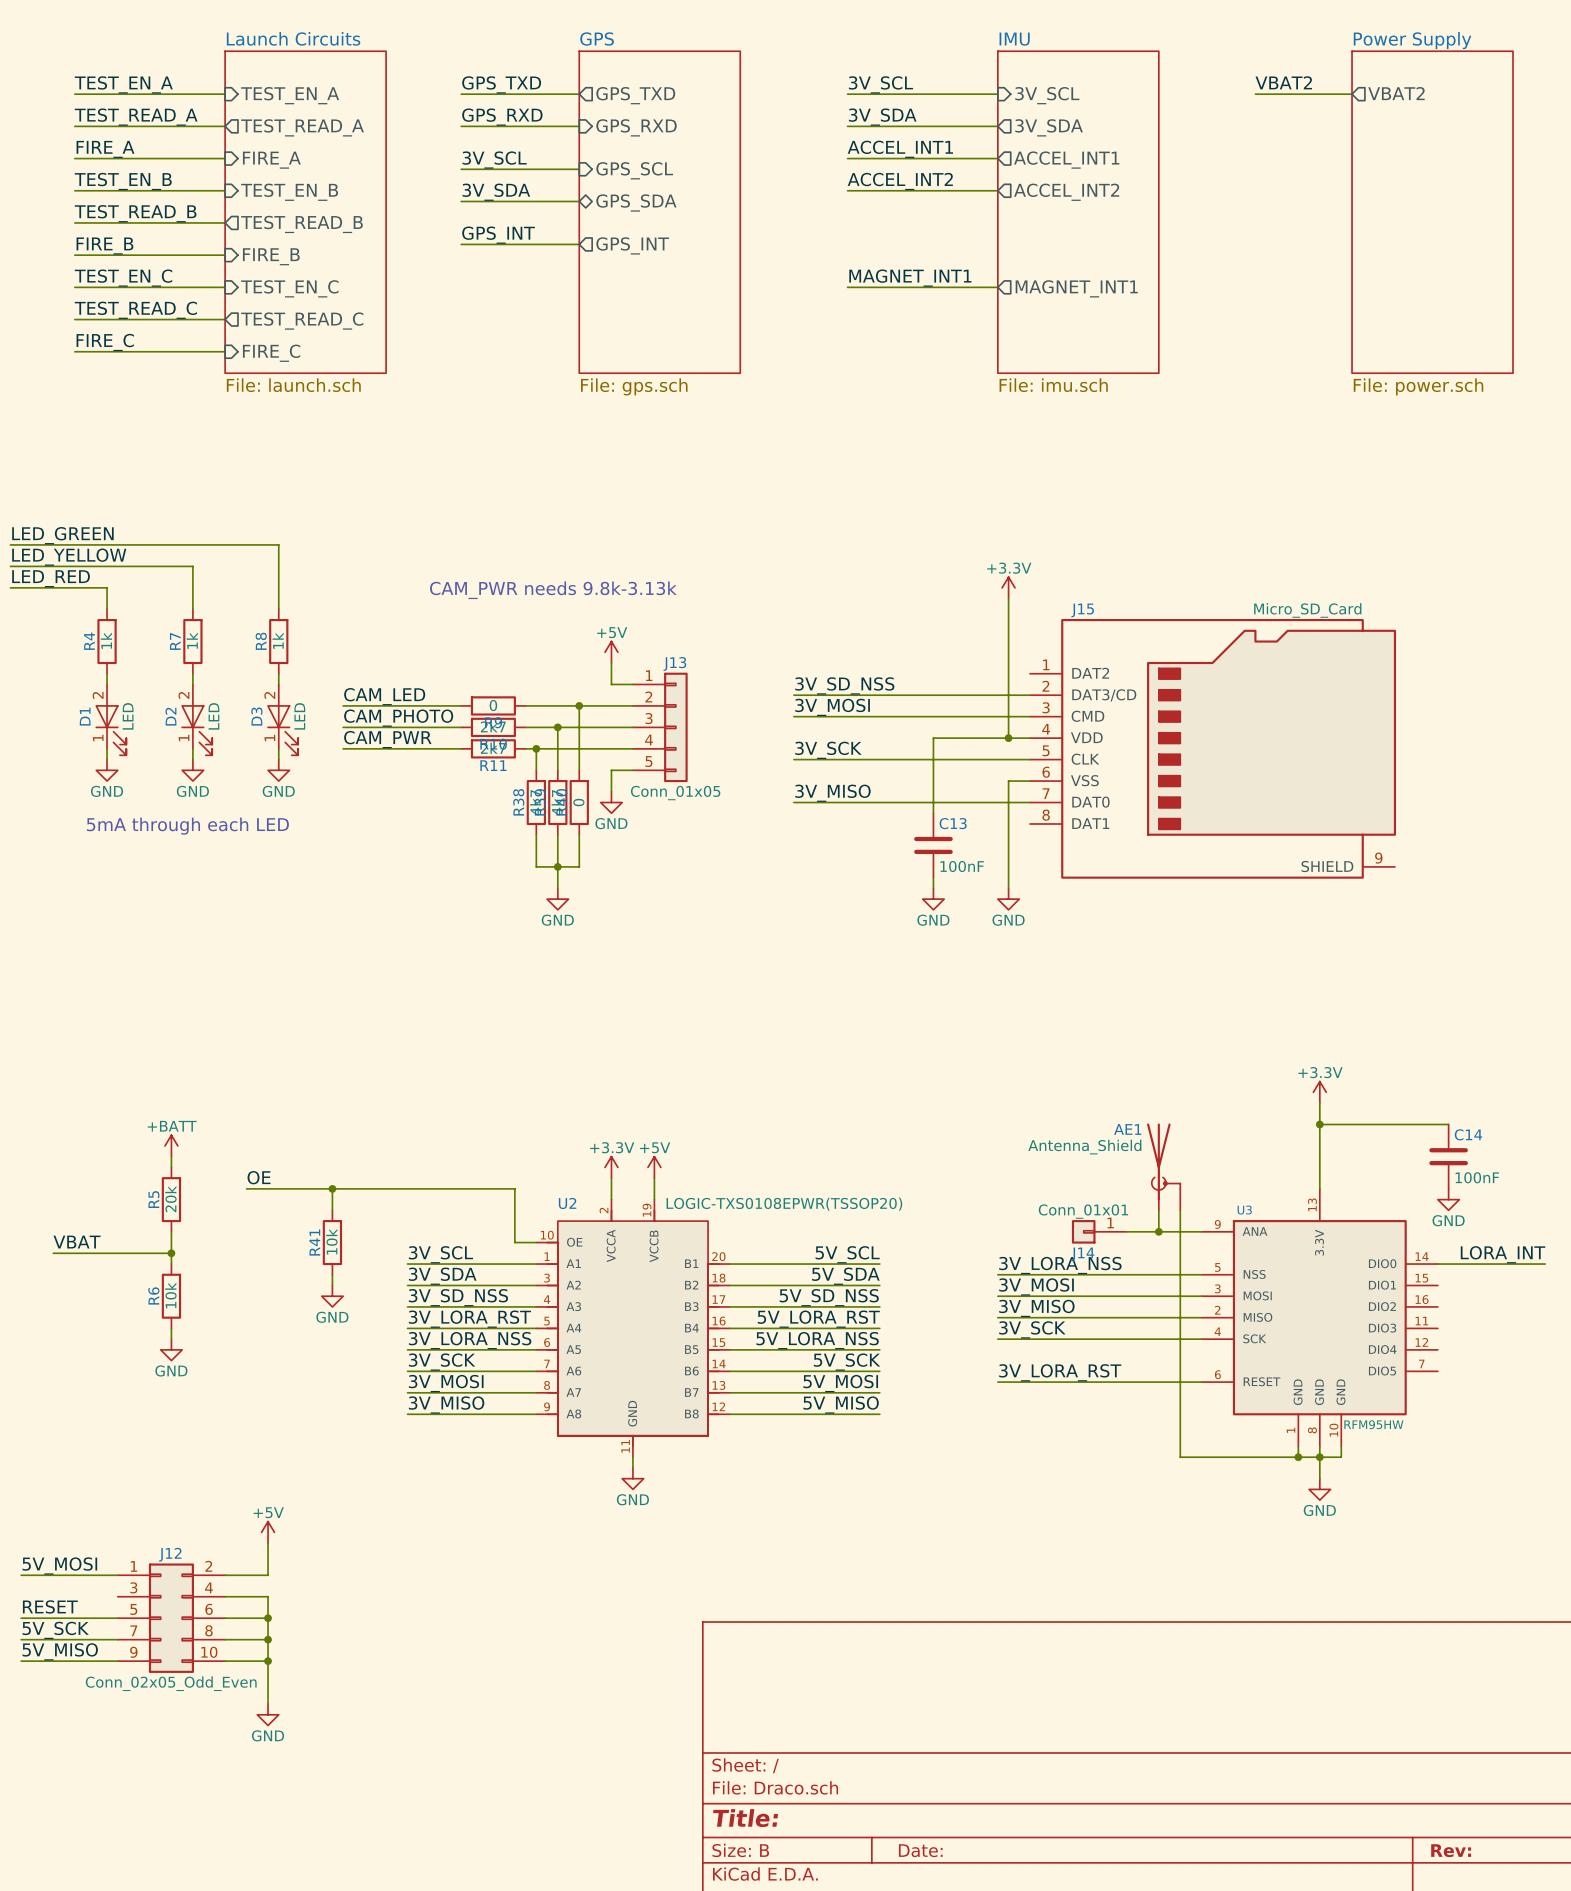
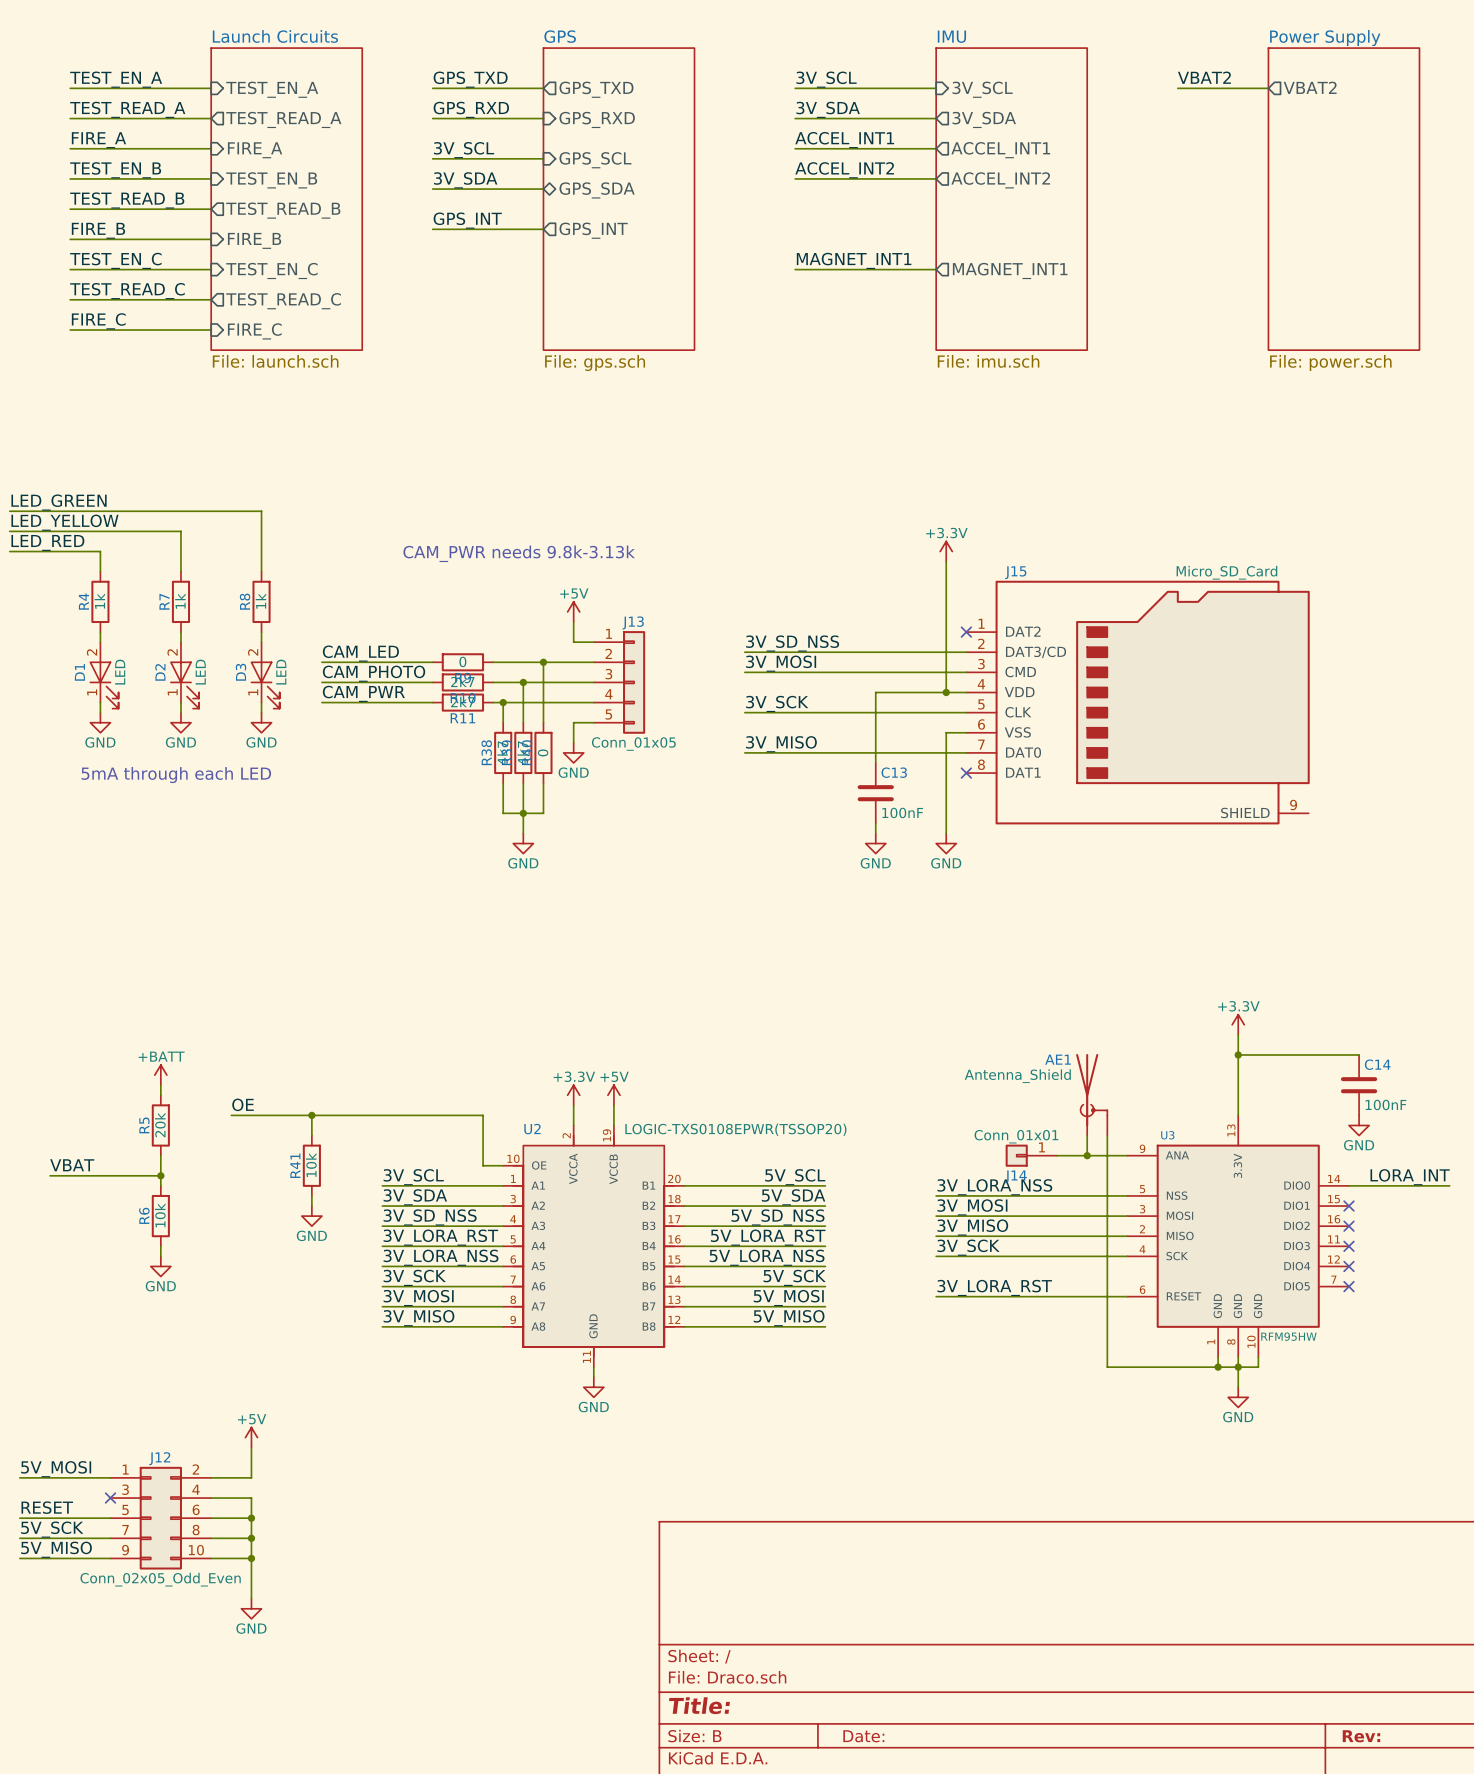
no-connect mark: none -> (966, 632)
no-connect mark: none -> (966, 773)
no-connect mark: none -> (1349, 1206)
no-connect mark: none -> (1349, 1226)
no-connect mark: none -> (1349, 1246)
no-connect mark: none -> (1349, 1266)
no-connect mark: none -> (1349, 1286)
no-connect mark: none -> (110, 1498)

